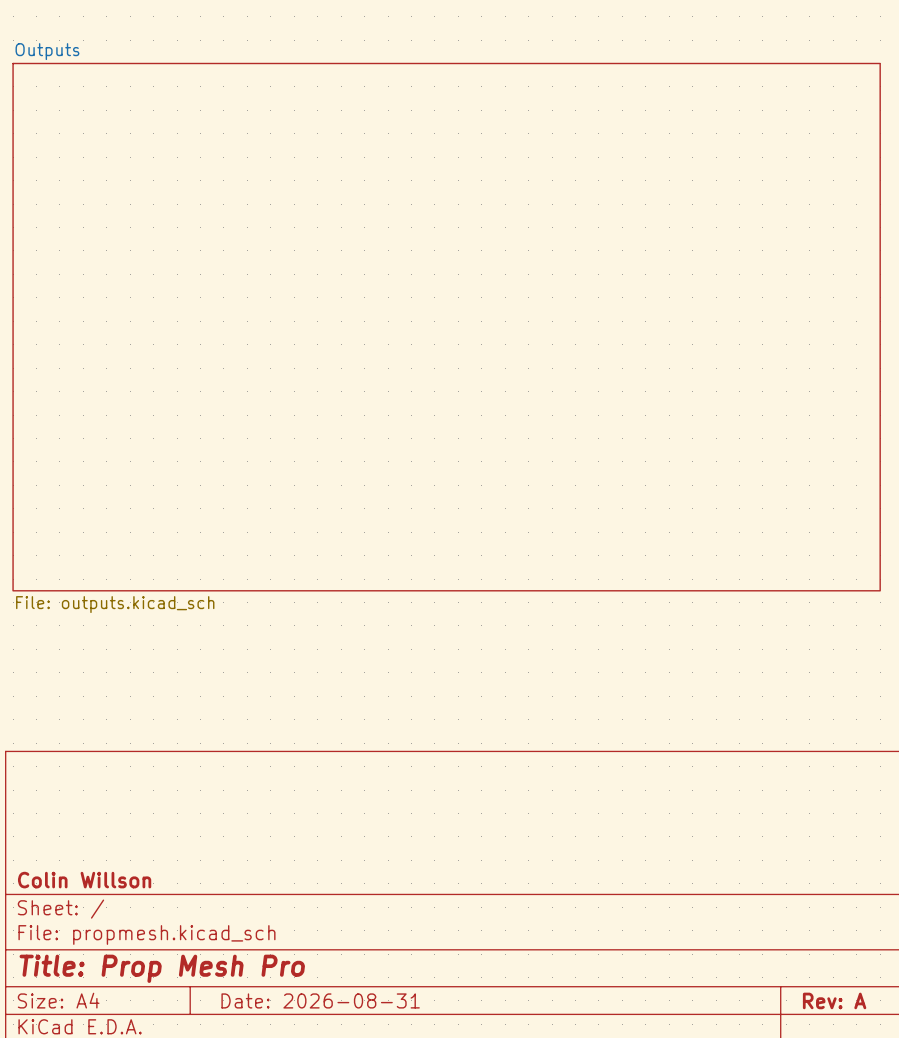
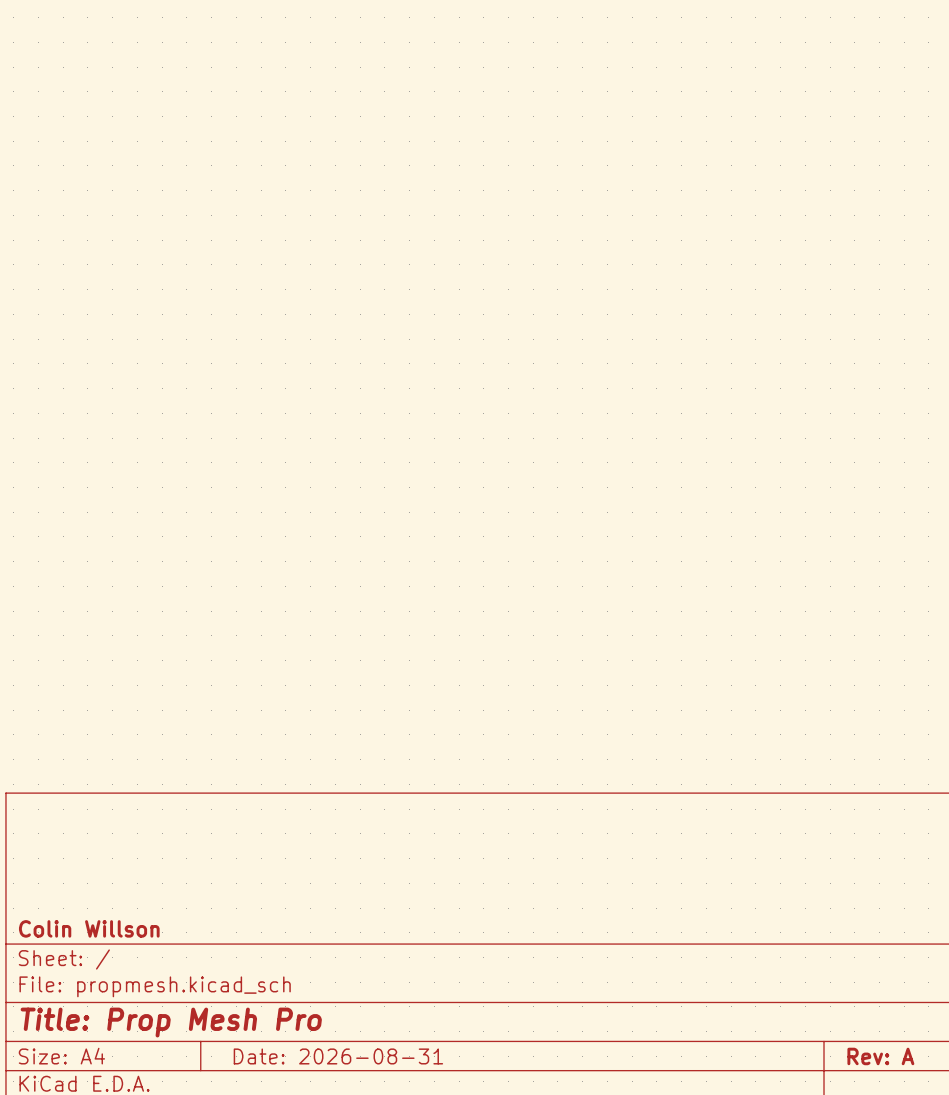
sheet Outputs: File: outputs.kicad_sch (446, 327) -> none

